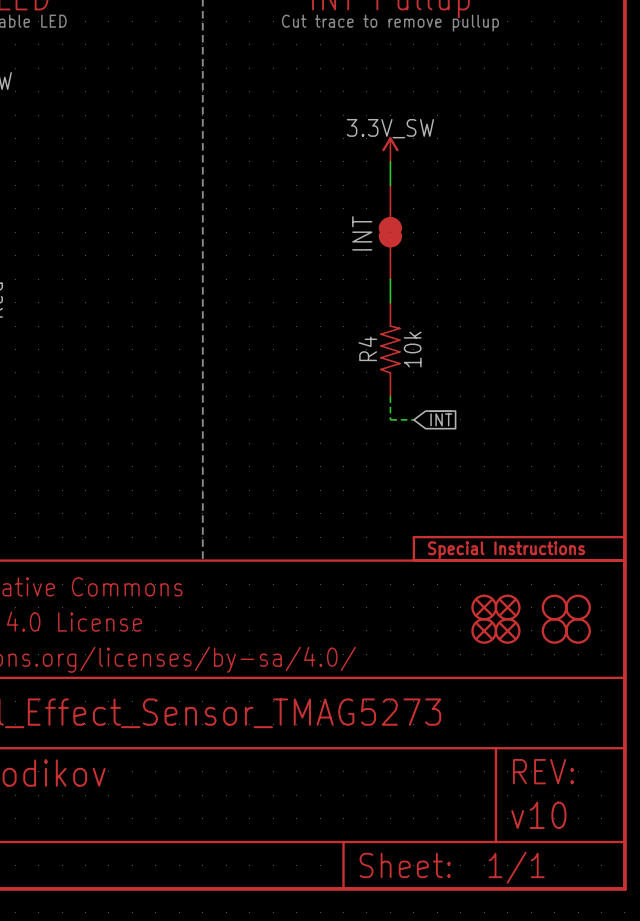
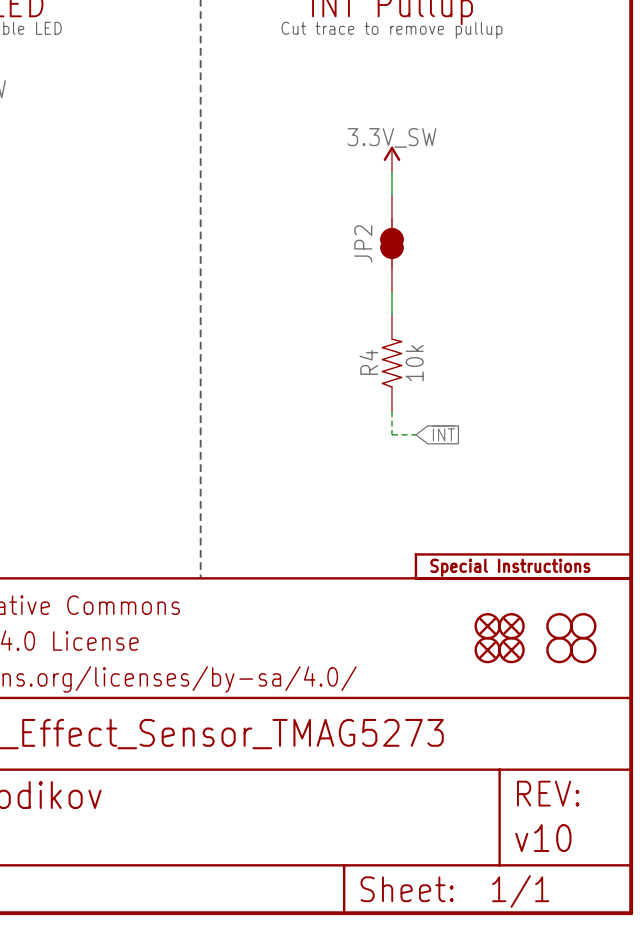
JP2 name: none -> JP2 (363, 243)
text: INT (362, 233) -> none

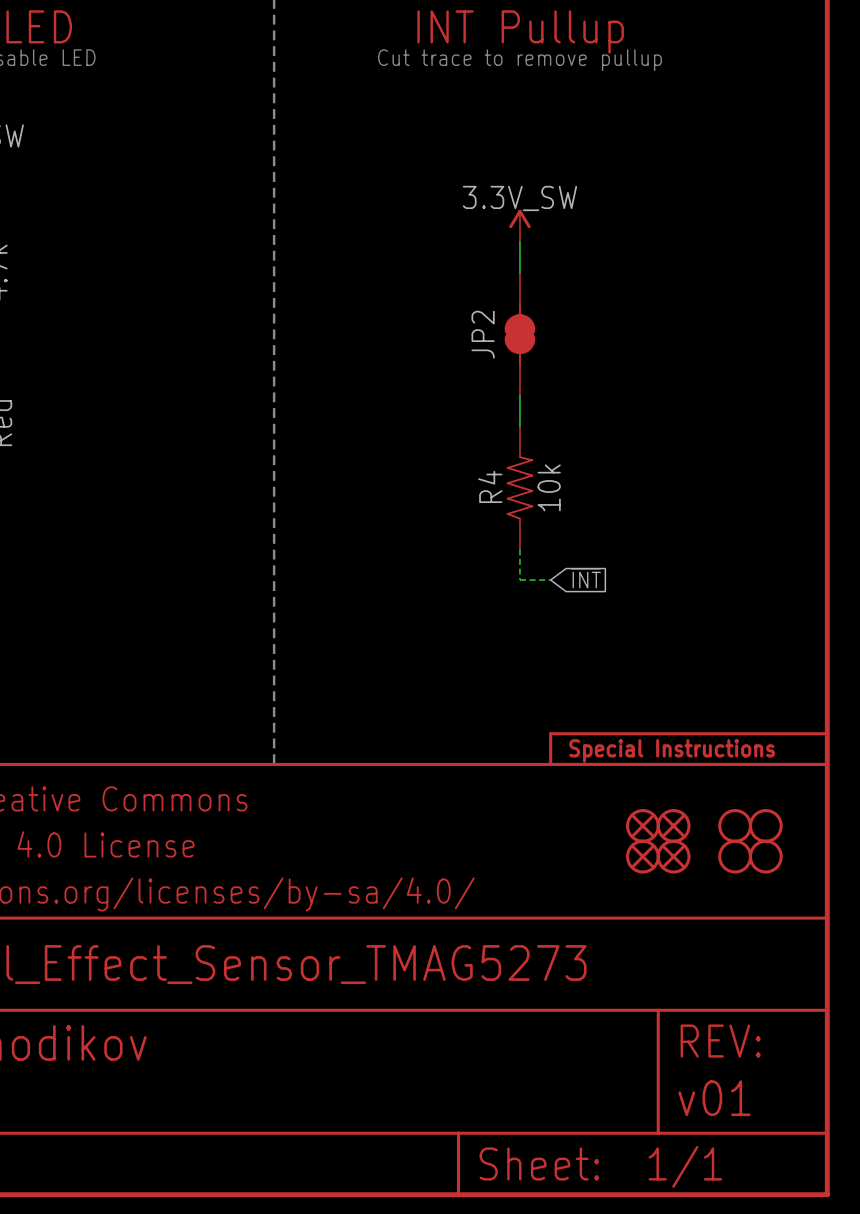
part text: v10 (543, 838) -> v01 (714, 1098)

